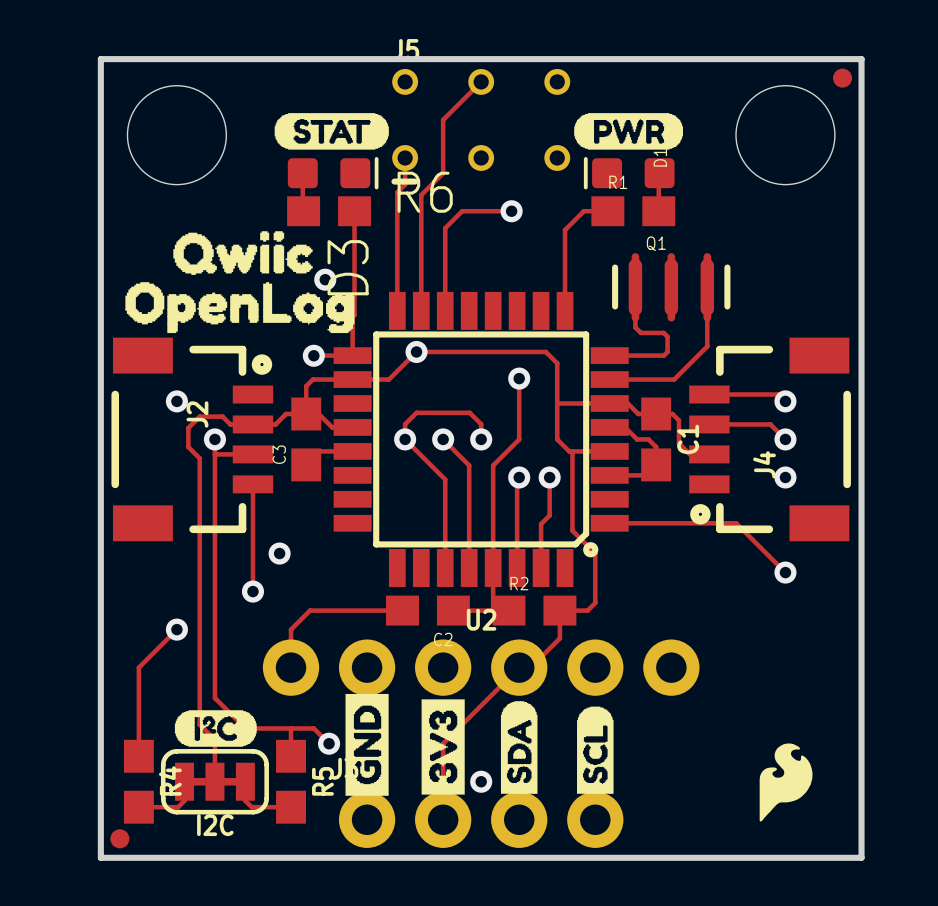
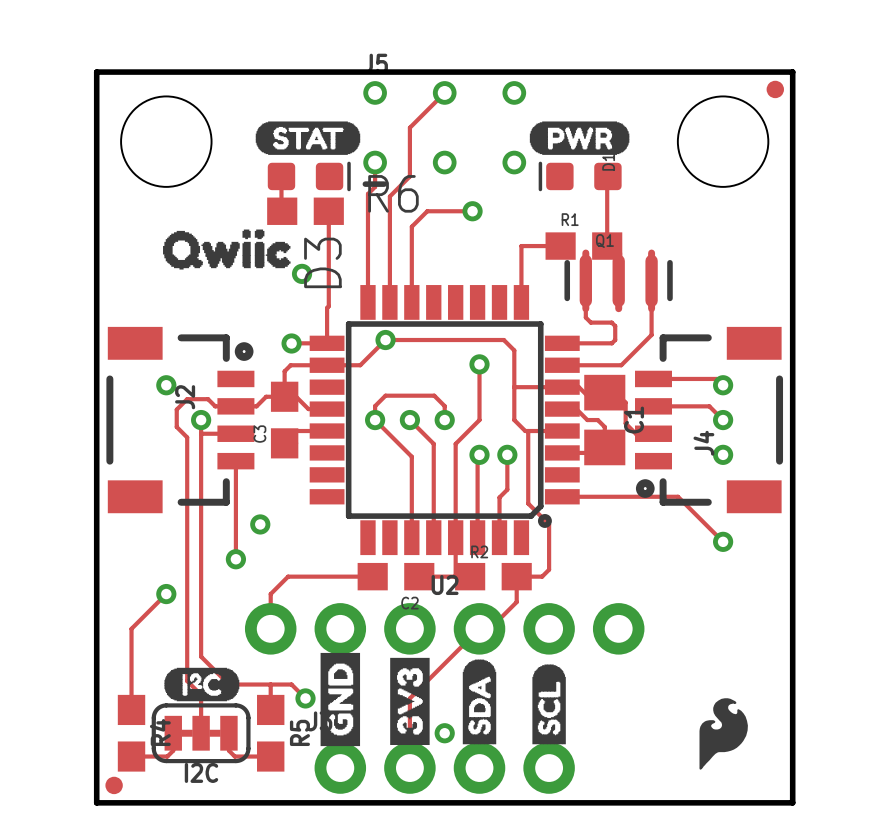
track: (607, 211) (583, 211) (565, 230) (565, 249) -> (560, 246) (521, 246)
R1 position: (633, 211) -> (583, 246)
track: none -> (607, 211) (607, 246)
drawing: [125, 282, 355, 334] -> none
C1 footprint: [641, 397, 672, 482] -> [584, 374, 626, 466]

